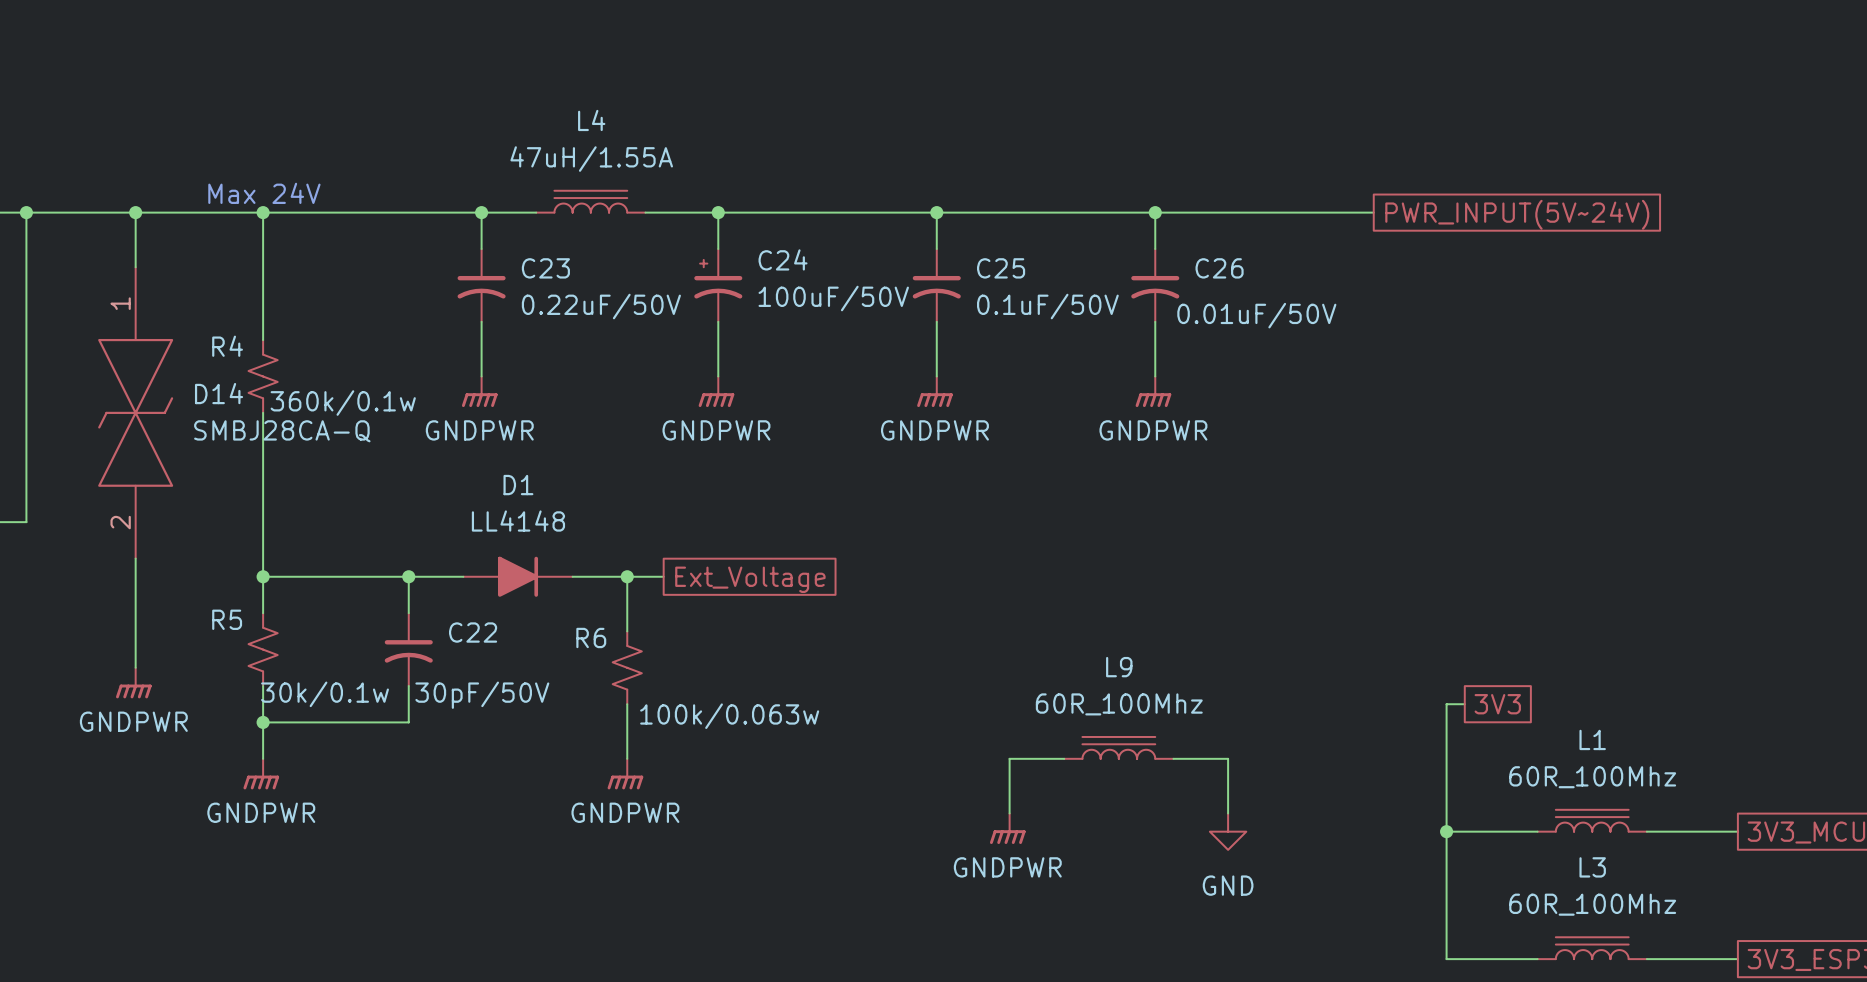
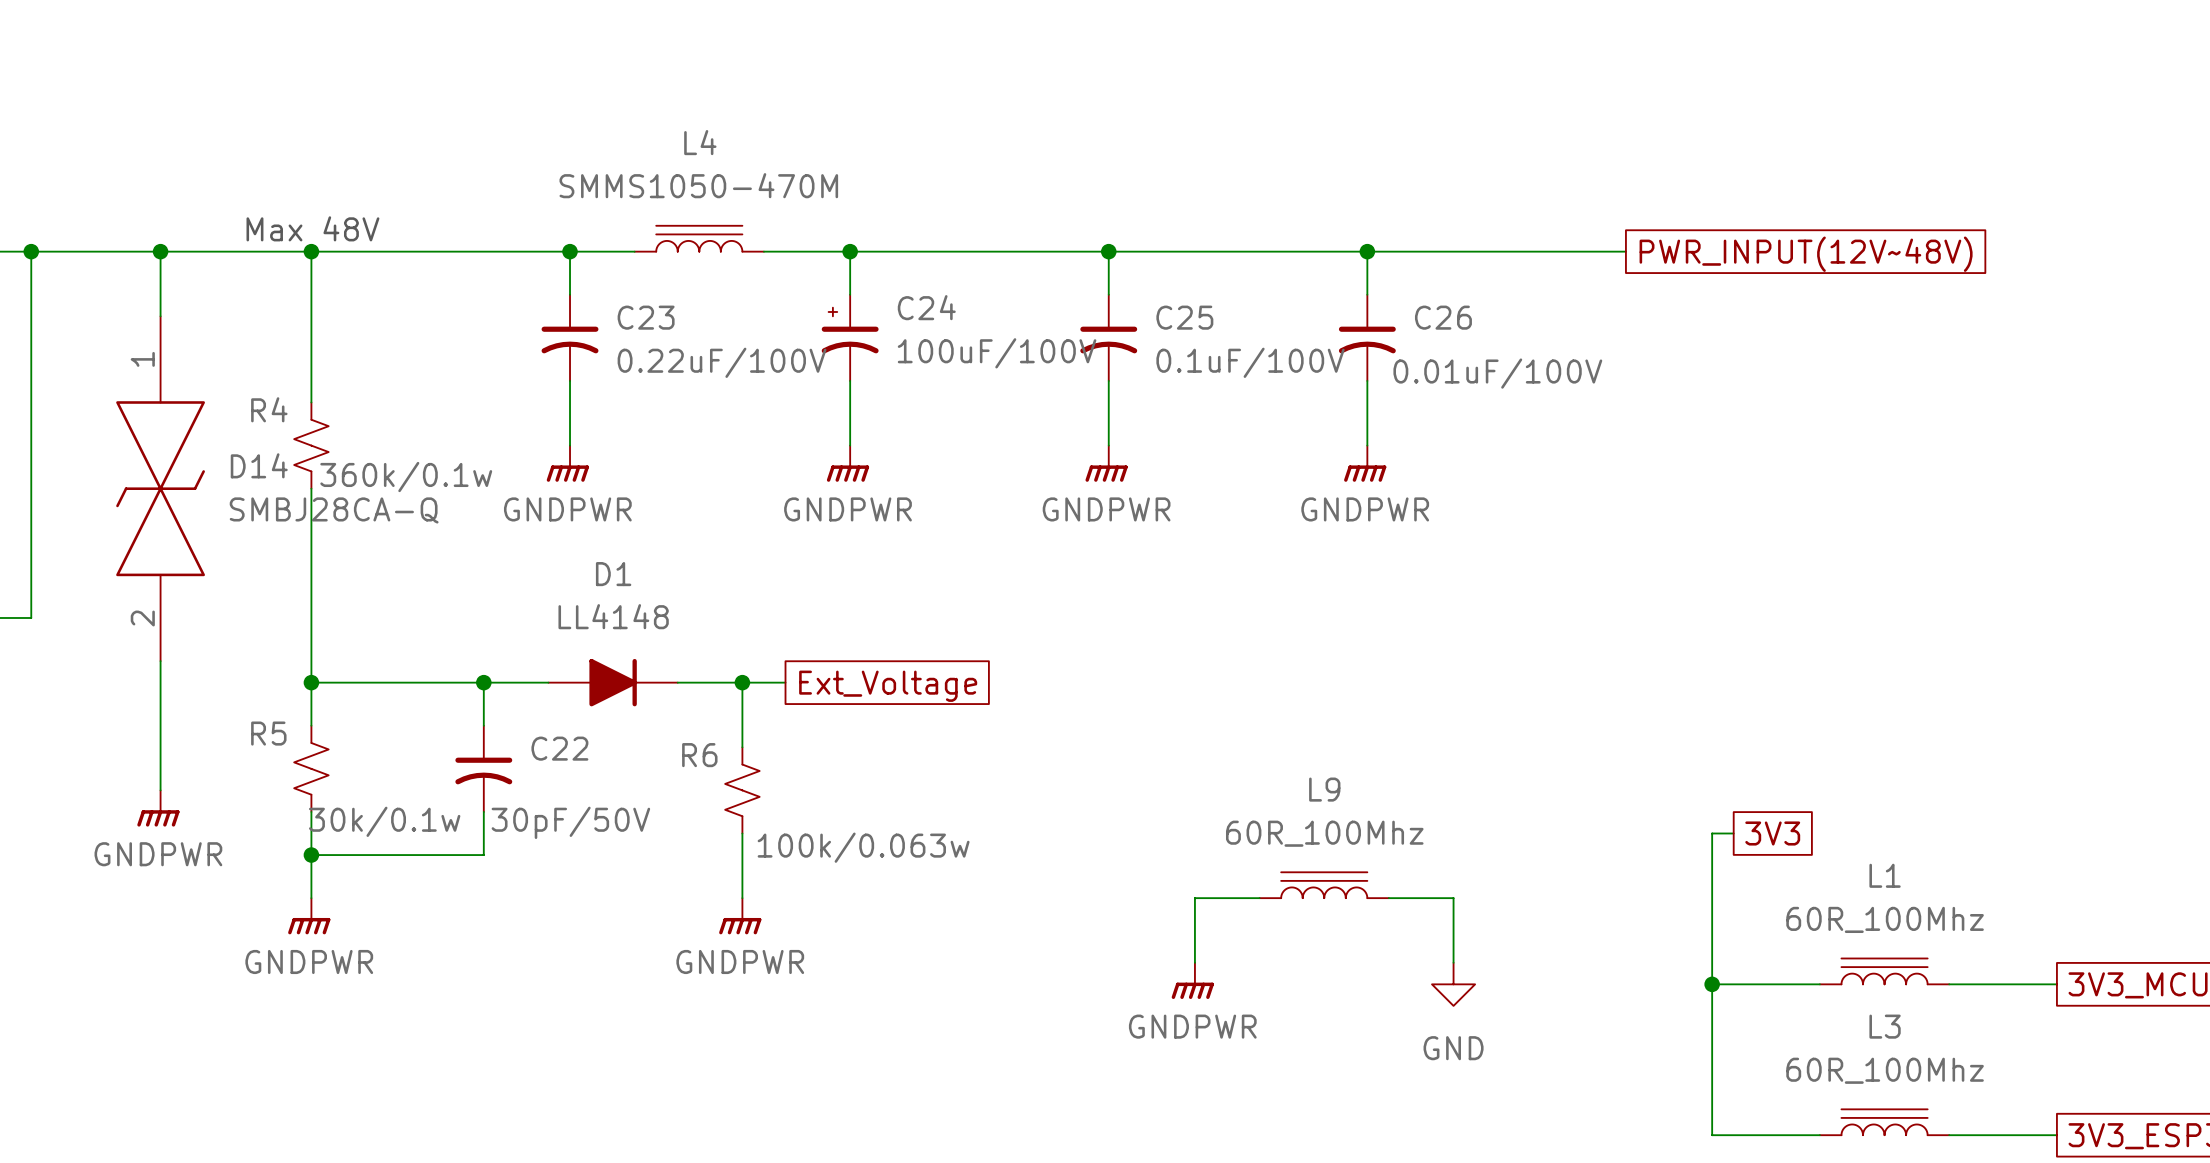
L4 value: 47uH/1.55A (591, 159) -> SMMS1050-470M (698, 185)
text: Max 24V (264, 193) -> Max 48V (312, 228)
global label: PWR_INPUT(5V~24V) (1517, 214) -> PWR_INPUT(12V~48V) (1806, 254)
C24 value: 100uF/50V (833, 298) -> 100uF/100V (997, 353)
C23 value: 0.22uF/50V (601, 306) -> 0.22uF/100V (722, 362)
C25 value: 0.1uF/50V (1047, 306) -> 0.1uF/100V (1250, 362)
C26 value: 0.01uF/50V (1256, 315) -> 0.01uF/100V (1497, 373)

